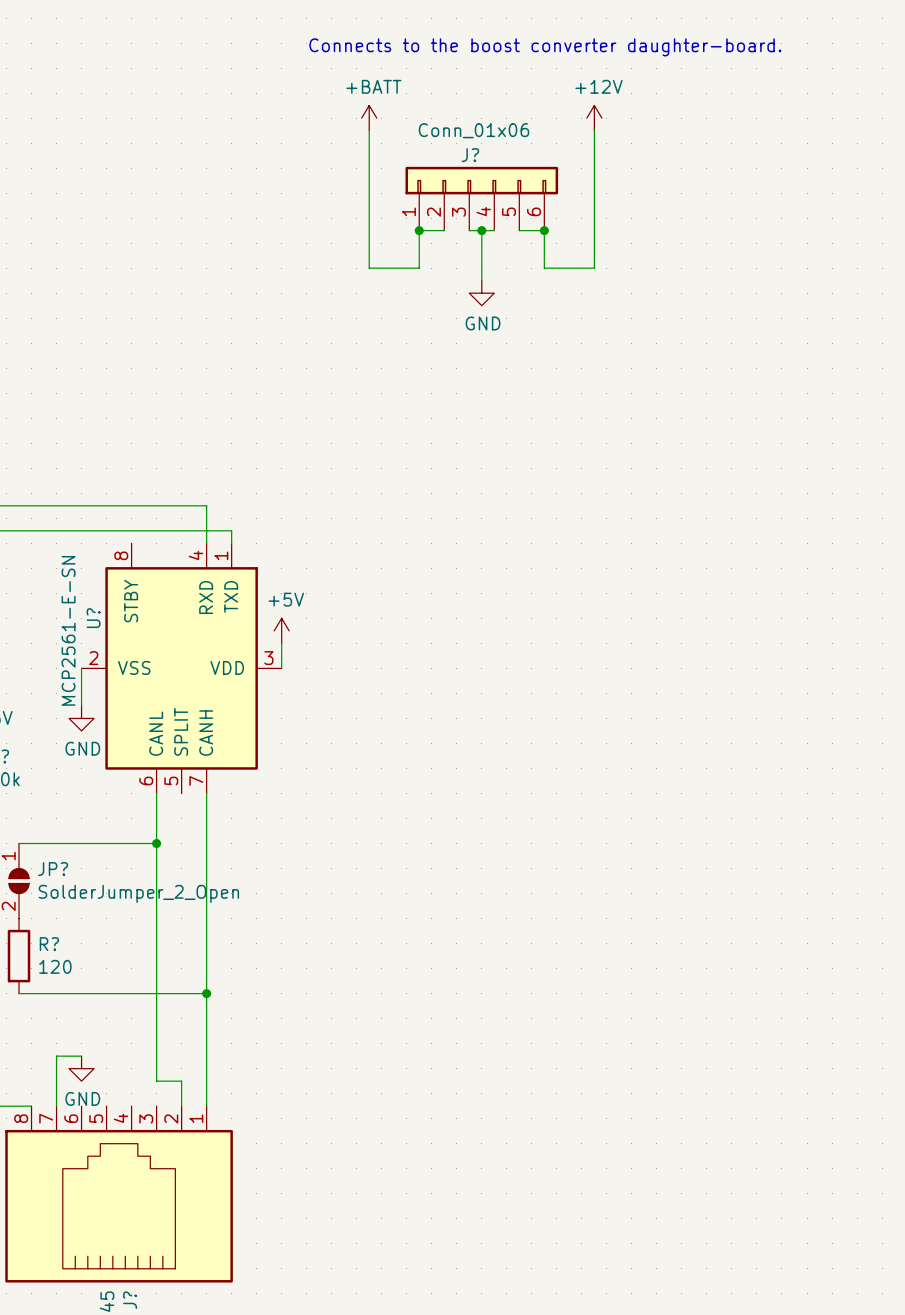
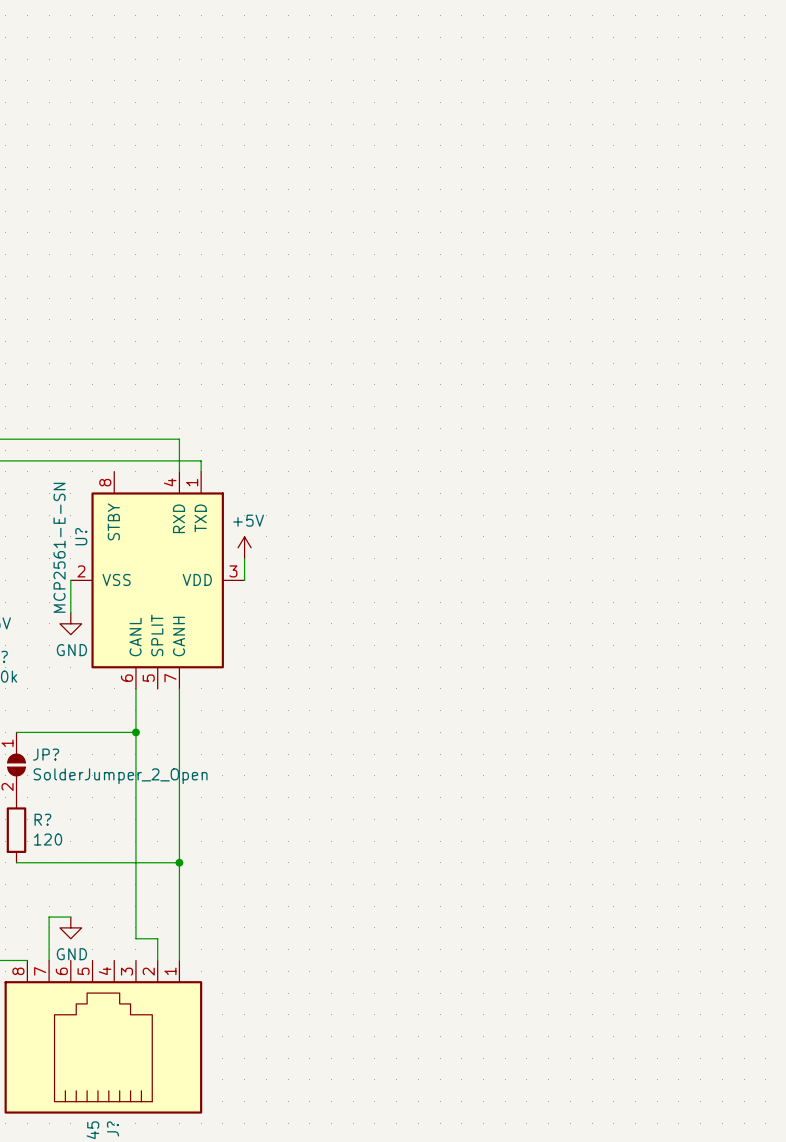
text: Connects to the boost converter daughter-board. (545, 47) -> none
power symbol: +BATT (369, 118) -> none
power symbol: +12V (594, 118) -> none
wire: (369, 130) (369, 268) (419, 268) (419, 230) (444, 230) -> none
wire: (594, 130) (594, 268) (544, 268) (544, 230) (519, 230) -> none
J?: Conn_01x06 (481, 198) -> none
junction: (419, 230) -> none
wire: (469, 230) (494, 230) -> none
wire: (481, 230) (481, 280) -> none
junction: (481, 230) -> none
junction: (544, 230) -> none
power symbol: GND (481, 293) -> none

